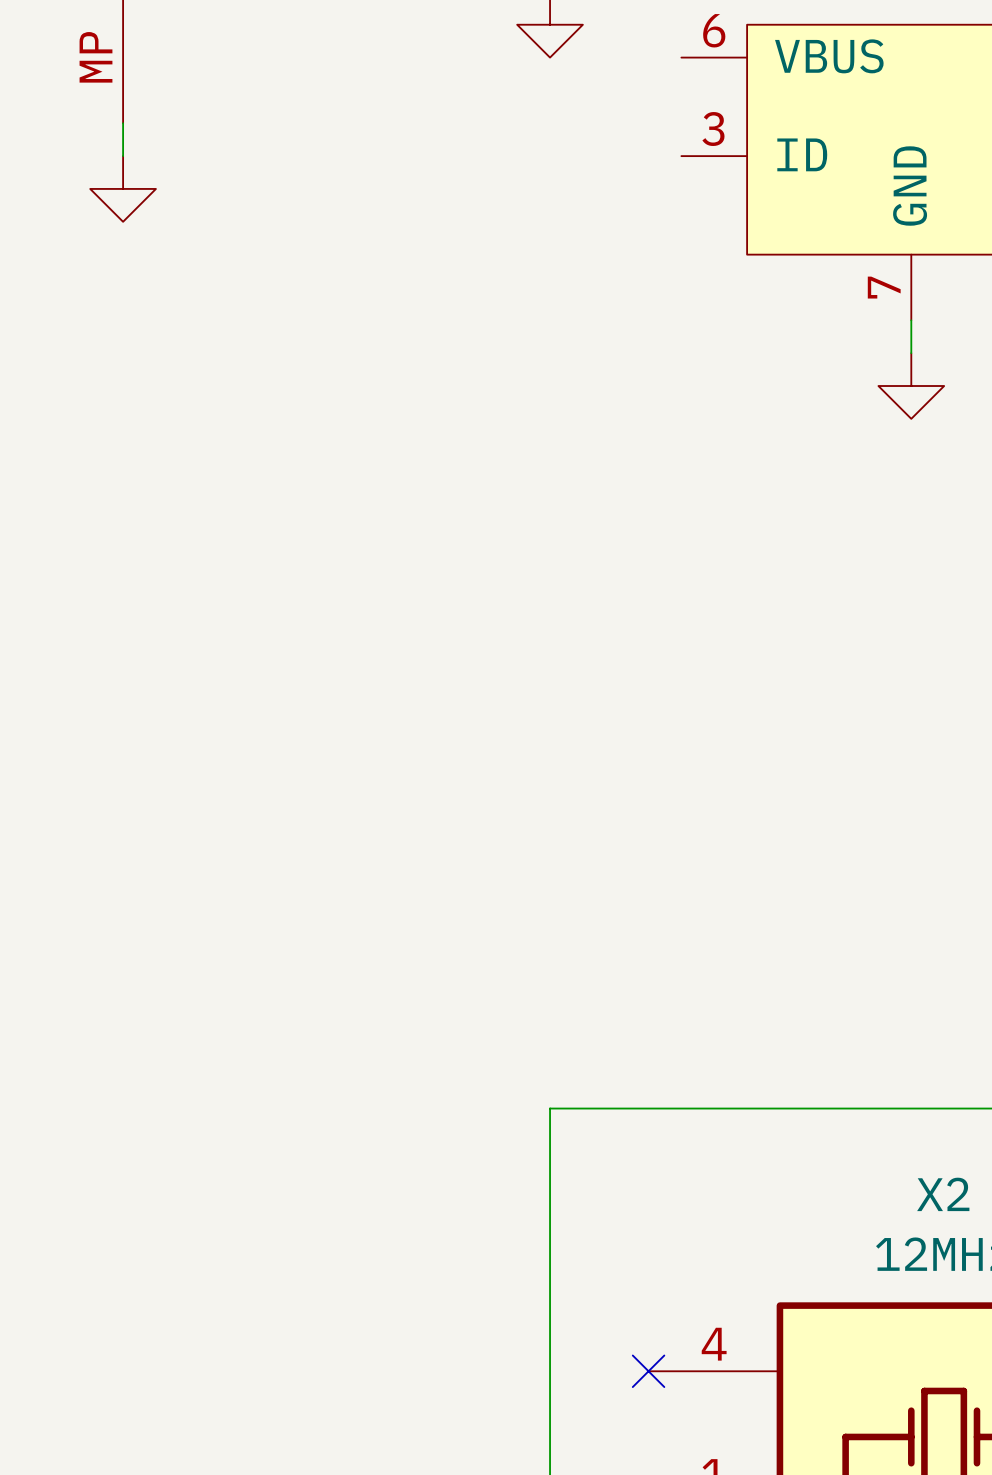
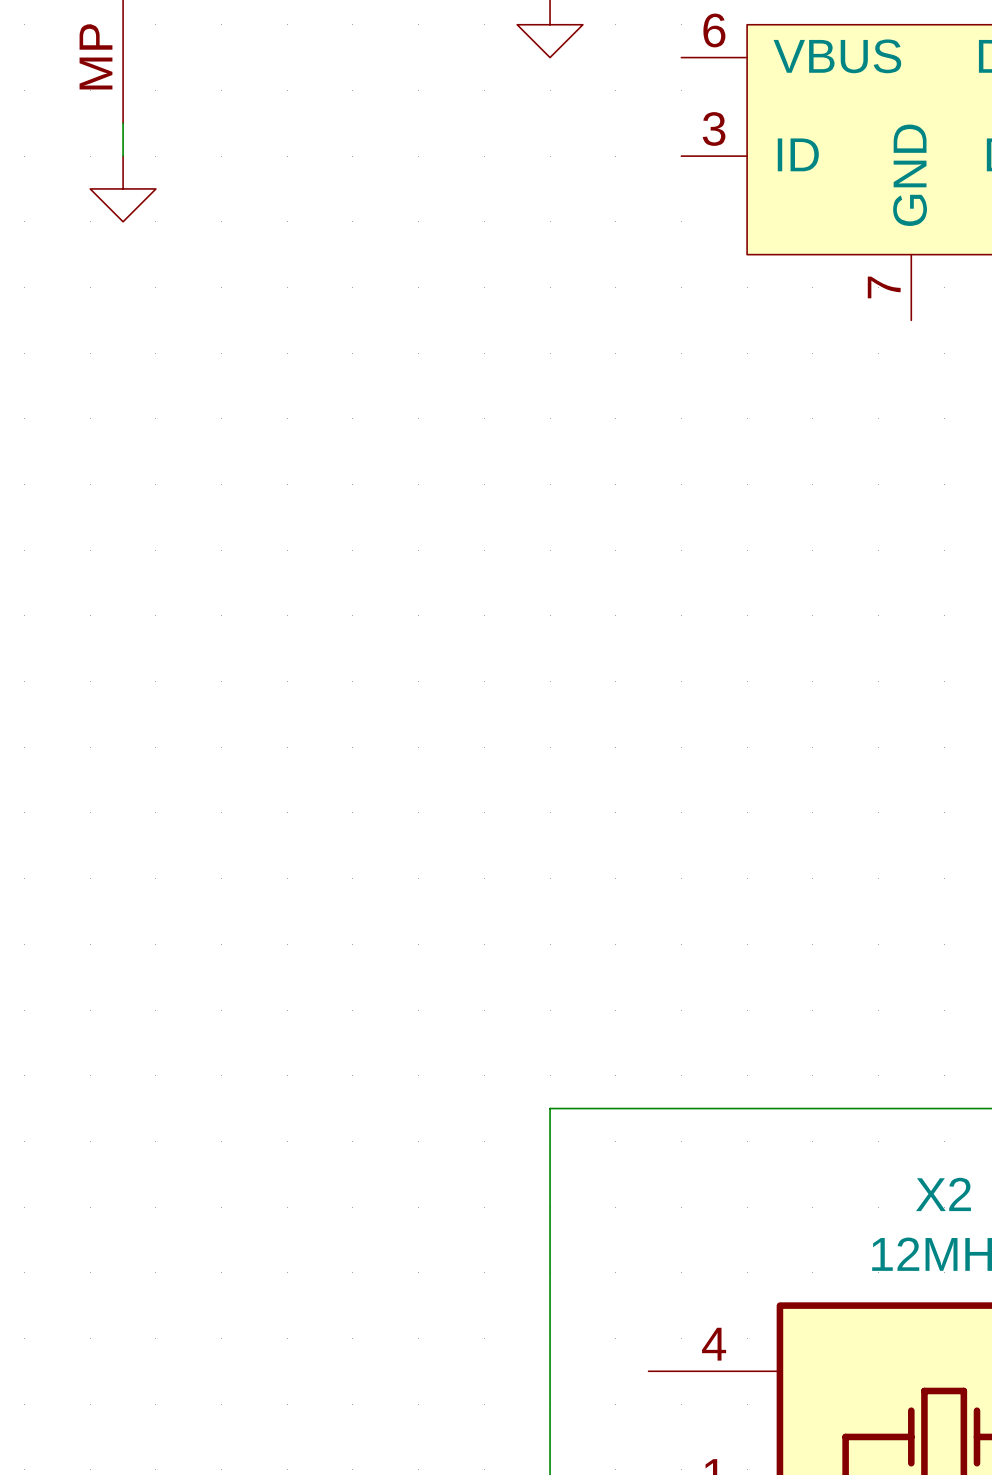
wire: (911, 320) (911, 353) -> none
power symbol: (911, 386) -> none
no-connect mark: (648, 1371) -> none

